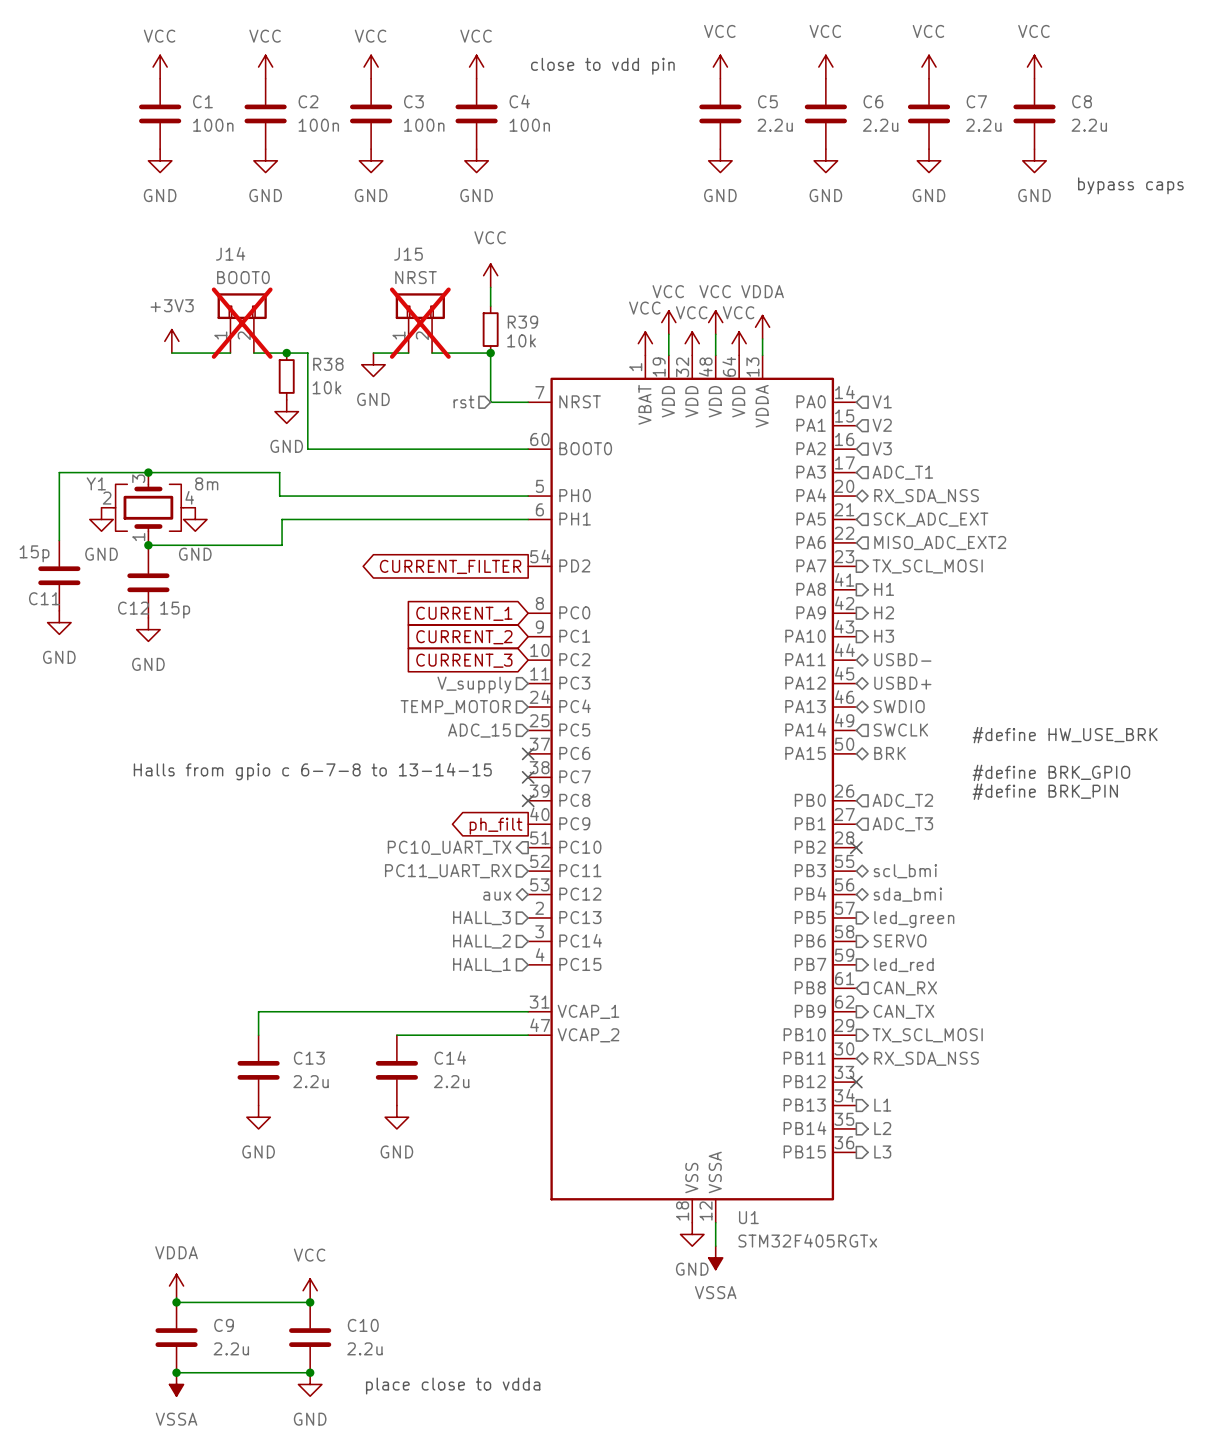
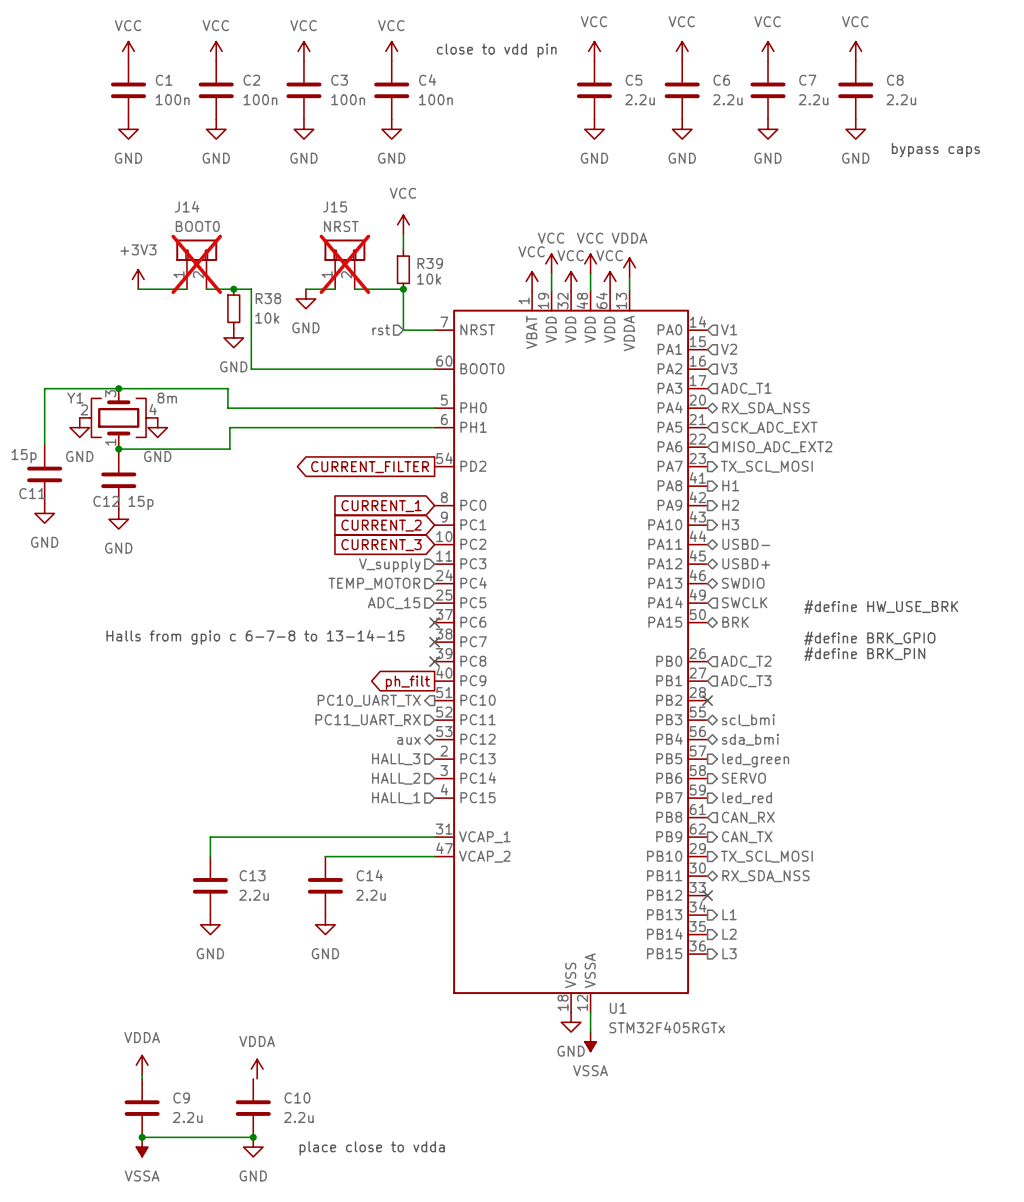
power symbol: VCC (310, 1290) -> VDDA (257, 1069)
wire: (176, 1302) (310, 1302) -> none
junction: (176, 1302) -> none
junction: (310, 1302) -> none

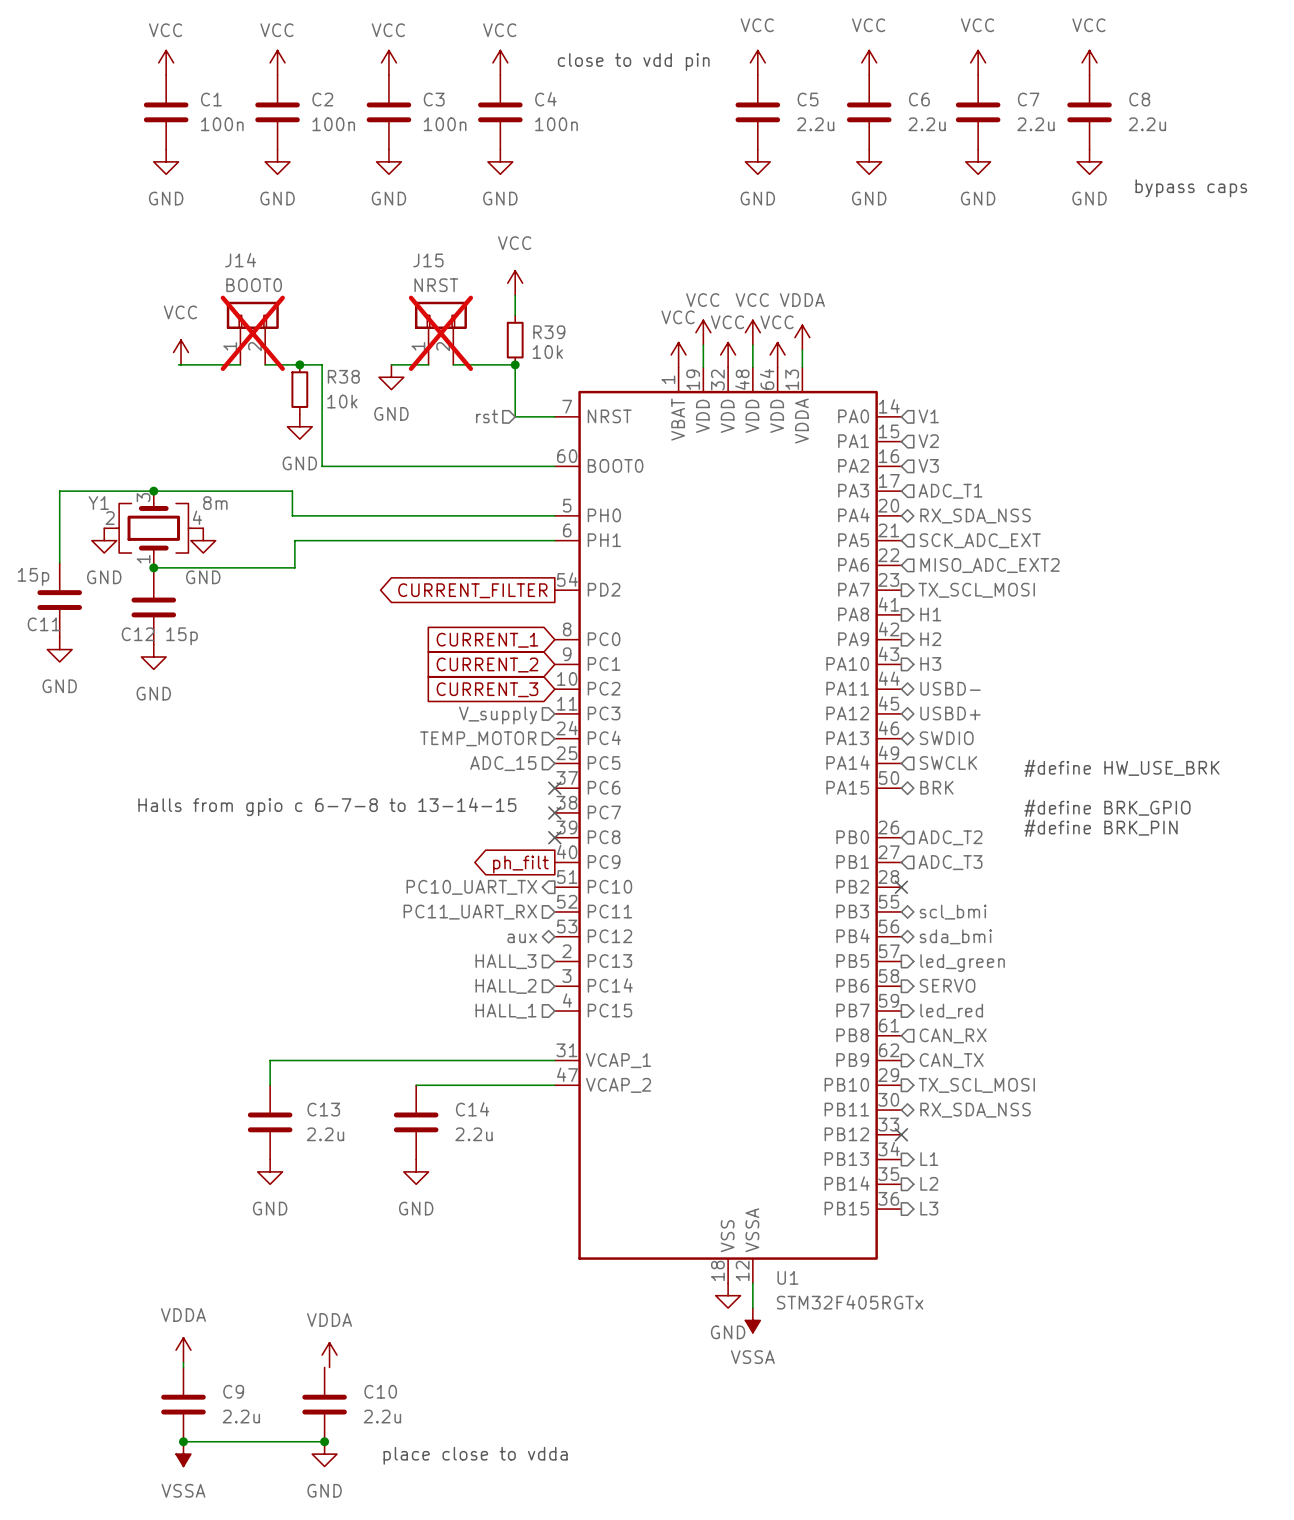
power symbol: +3V3 (138, 279) -> VCC (181, 352)

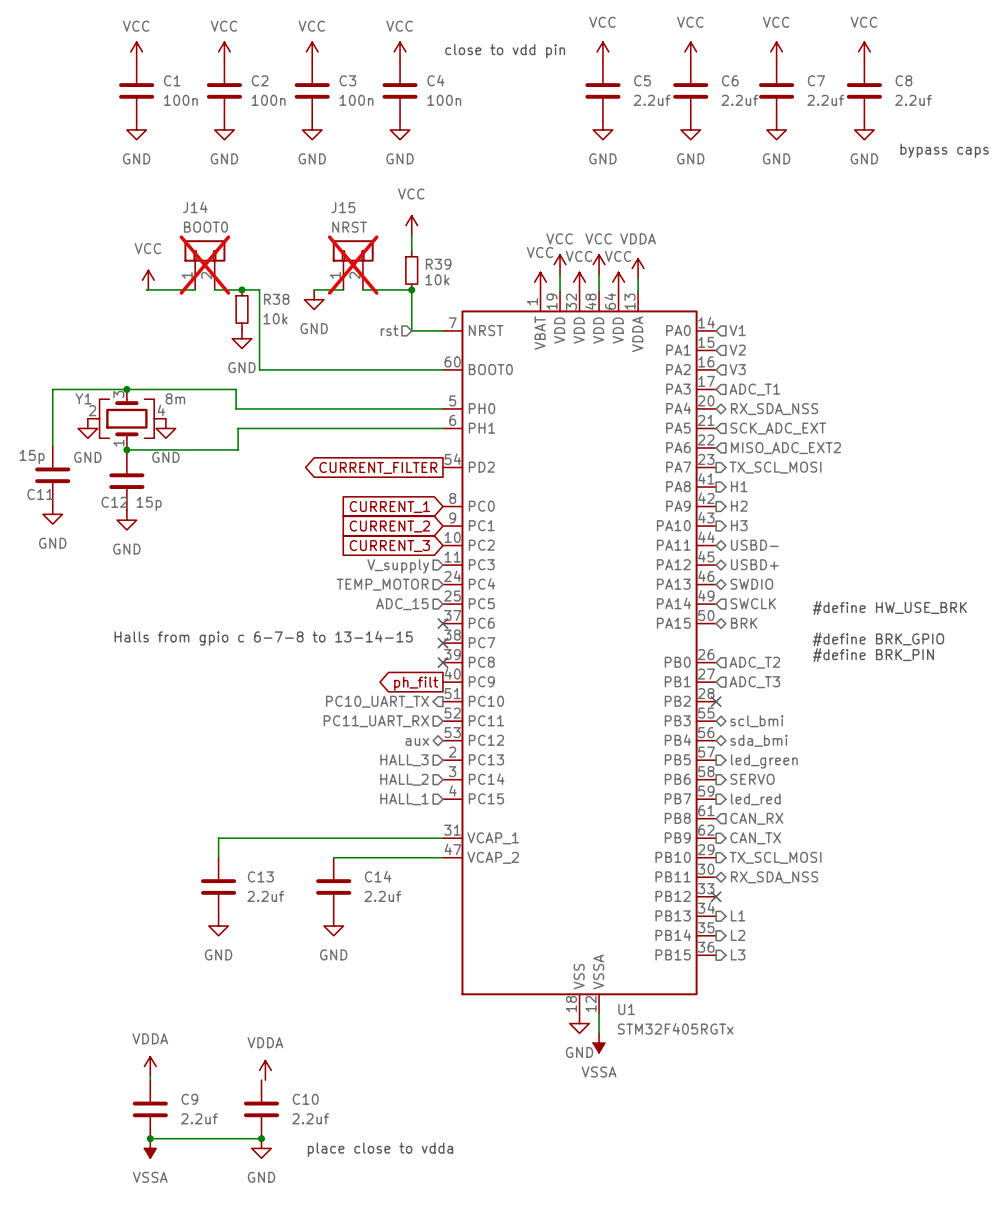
C5 value: 2.2u (815, 124) -> 2.2uf (652, 100)
C6 value: 2.2u (927, 124) -> 2.2uf (739, 100)
C7 value: 2.2u (1035, 124) -> 2.2uf (825, 100)
C8 value: 2.2u (1147, 124) -> 2.2uf (913, 100)
C13 value: 2.2u (325, 1134) -> 2.2uf (265, 896)
C14 value: 2.2u (474, 1134) -> 2.2uf (382, 896)
C9 value: 2.2u (241, 1416) -> 2.2uf (199, 1118)
C10 value: 2.2u (382, 1416) -> 2.2uf (310, 1118)

